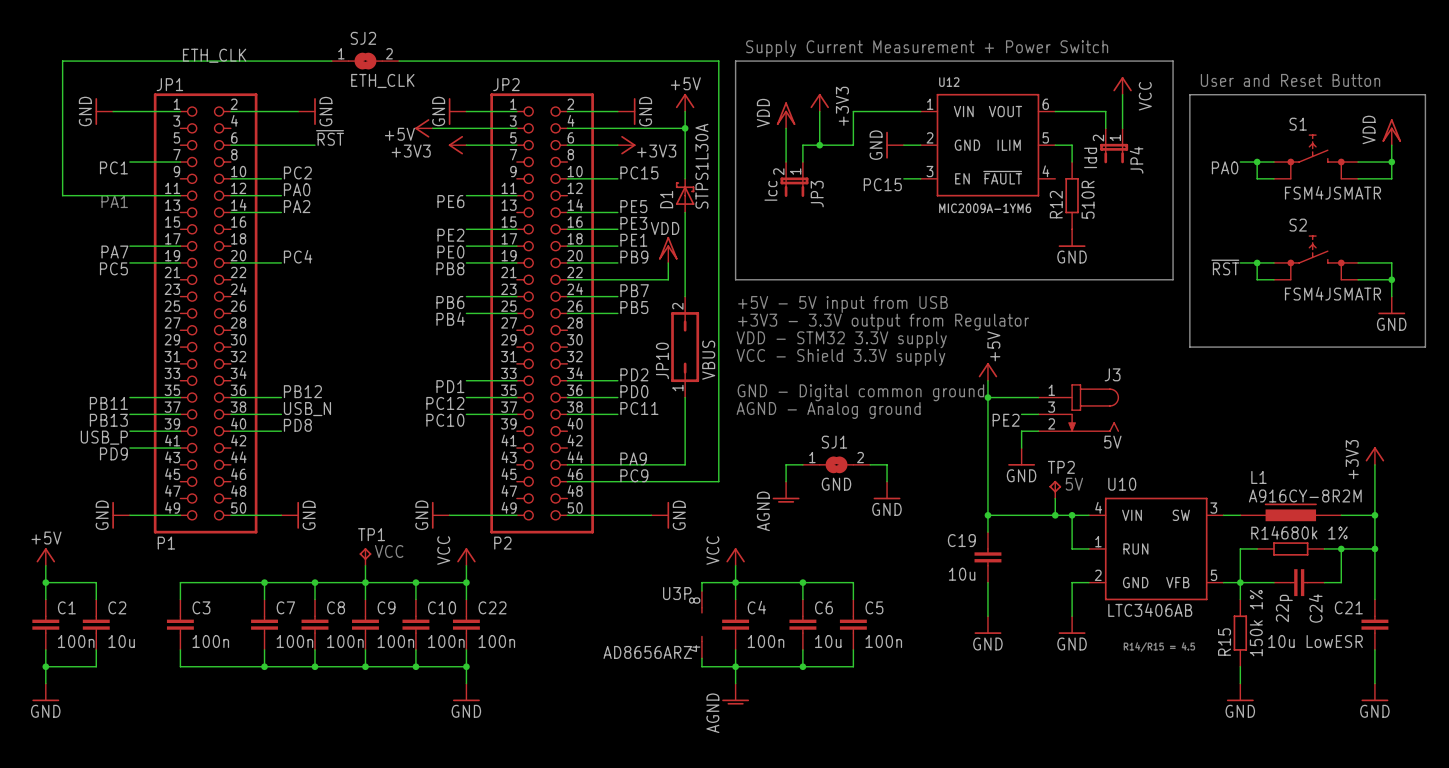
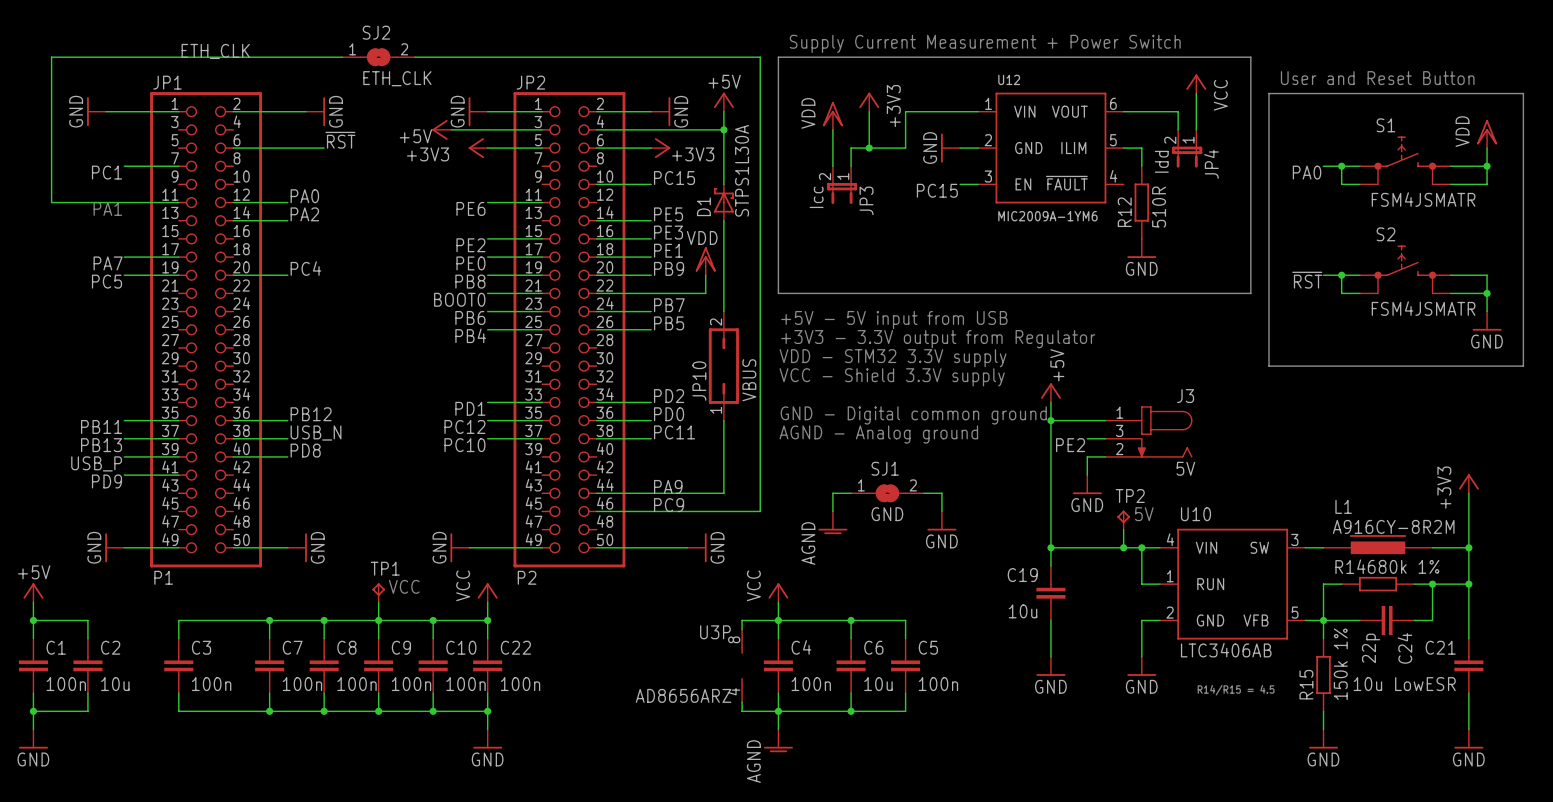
label: PC2 (297, 172) -> none
wire: (230, 178) (281, 178) -> none
wire: none -> (487, 293) (542, 293)
label: none -> BOOT0 (459, 299)

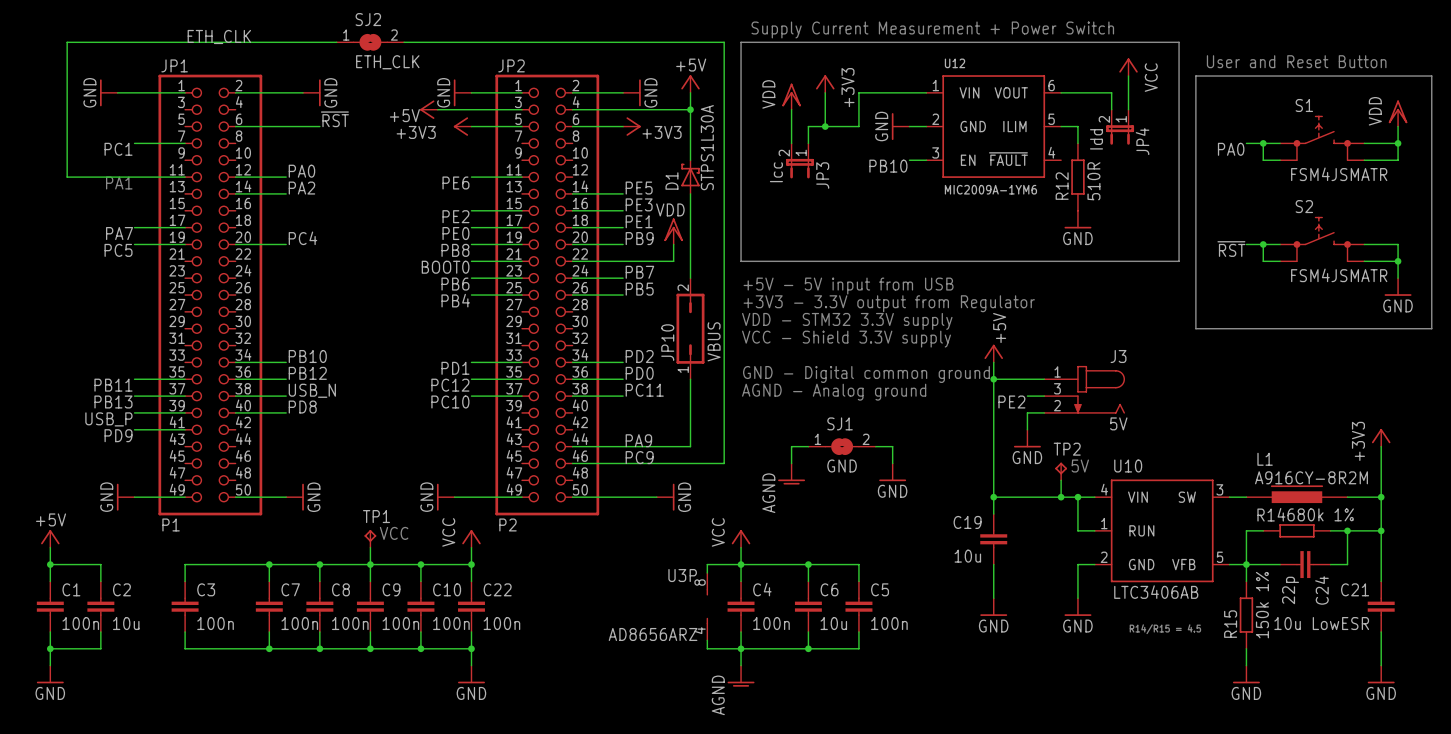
label: PC15 (674, 178) -> none
wire: (596, 184) (651, 184) -> none
label: PC15 (937, 190) -> PB10 (888, 166)
label: none -> PB10 (307, 356)
wire: none -> (235, 362) (286, 362)

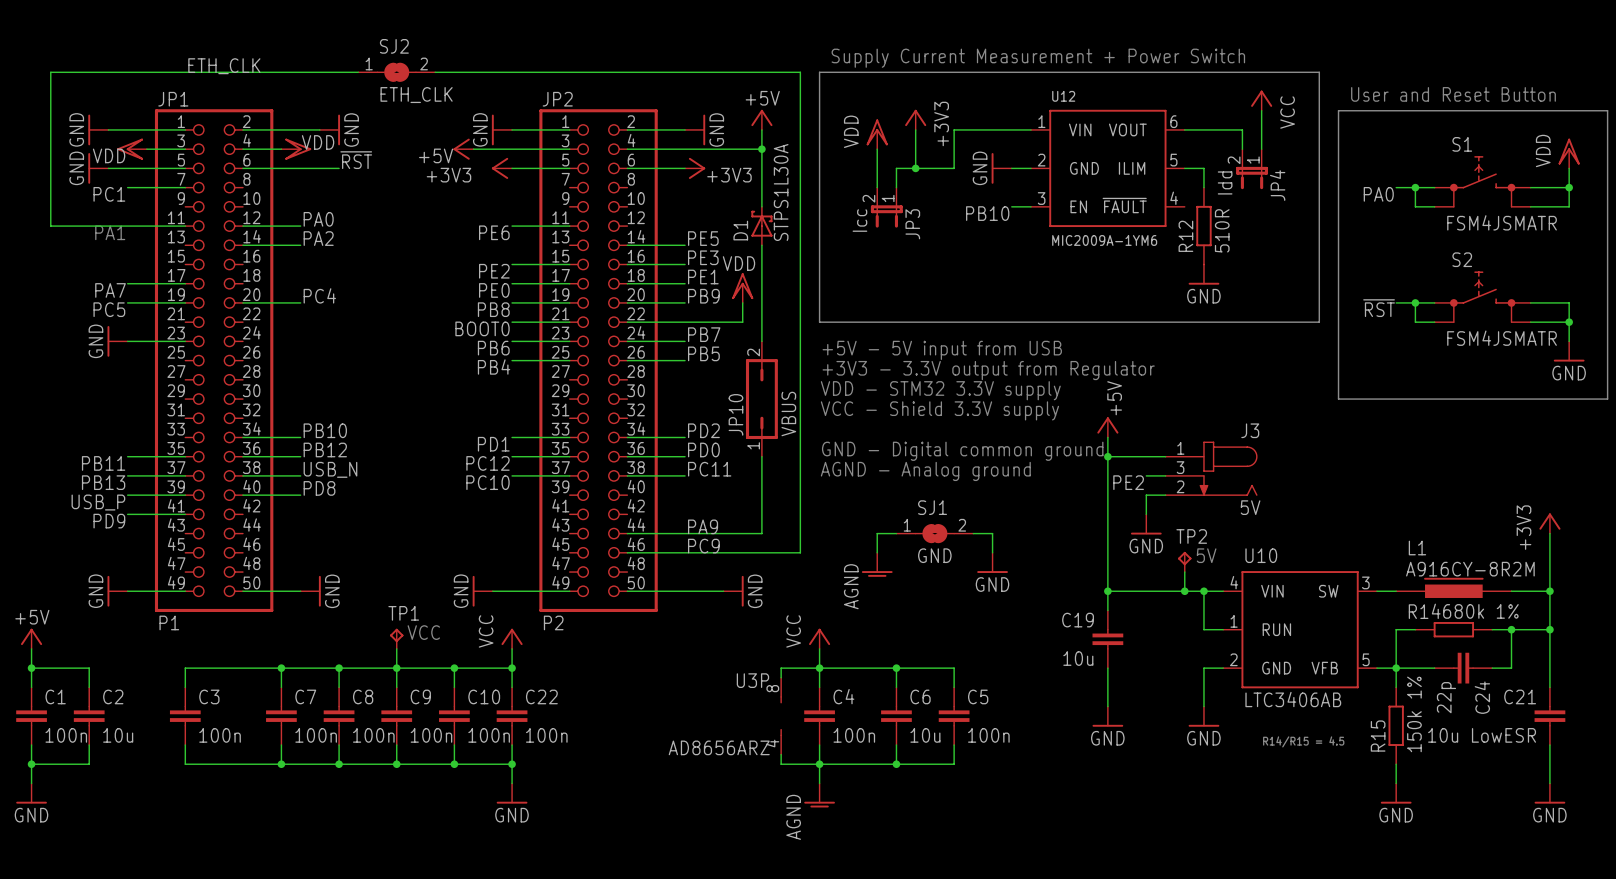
power symbol: none -> VDD (131, 149)
wire: none -> (146, 149) (185, 149)
wire: none -> (242, 149) (281, 149)
power symbol: none -> VDD (296, 149)
power symbol: none -> GND (98, 168)
wire: none -> (108, 168) (185, 168)
power symbol: none -> GND (117, 341)
wire: none -> (127, 341) (185, 341)

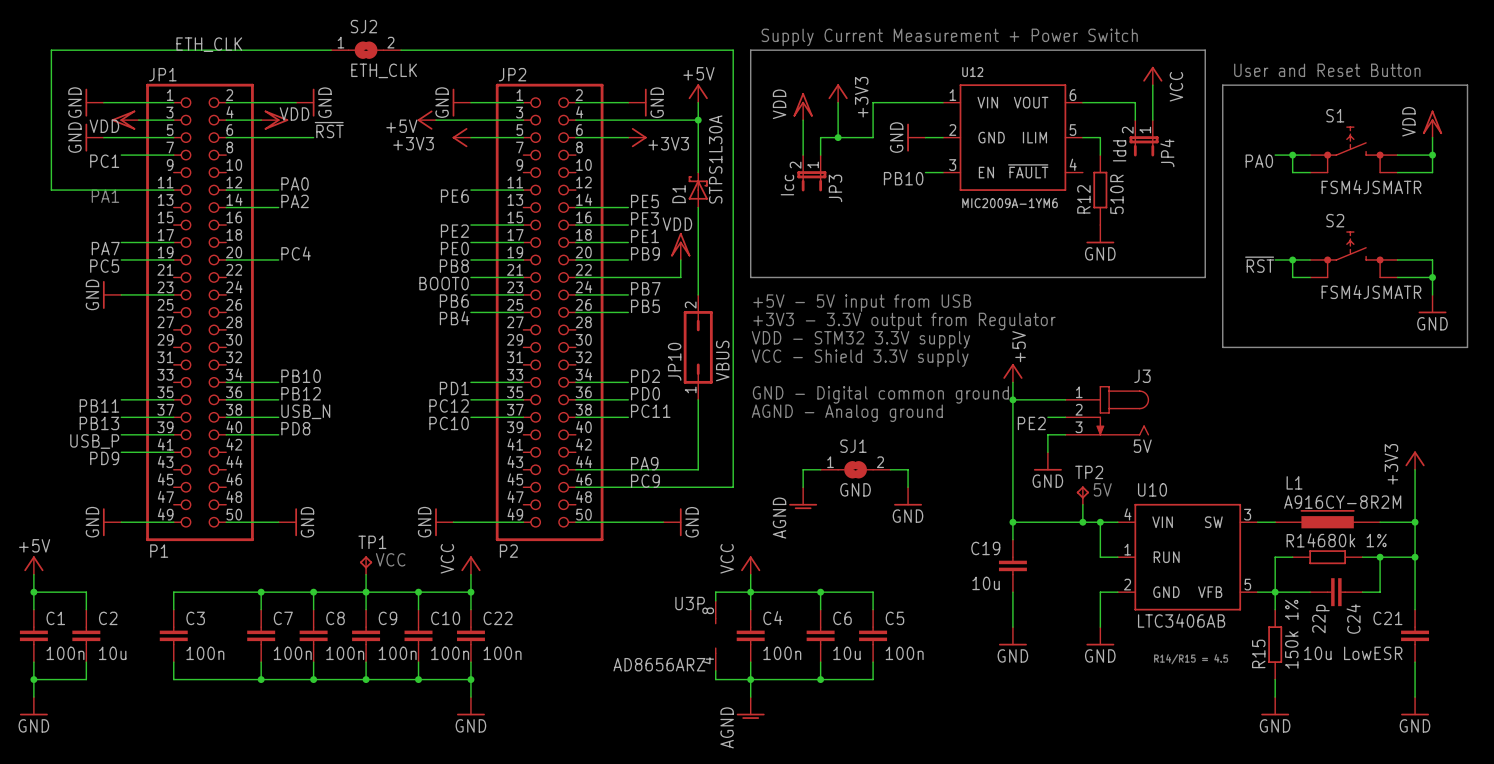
J3 pin number: 3 (1180, 467) -> 2 (1079, 409)
J3 pin number: 2 (1180, 486) -> 3 (1079, 427)

